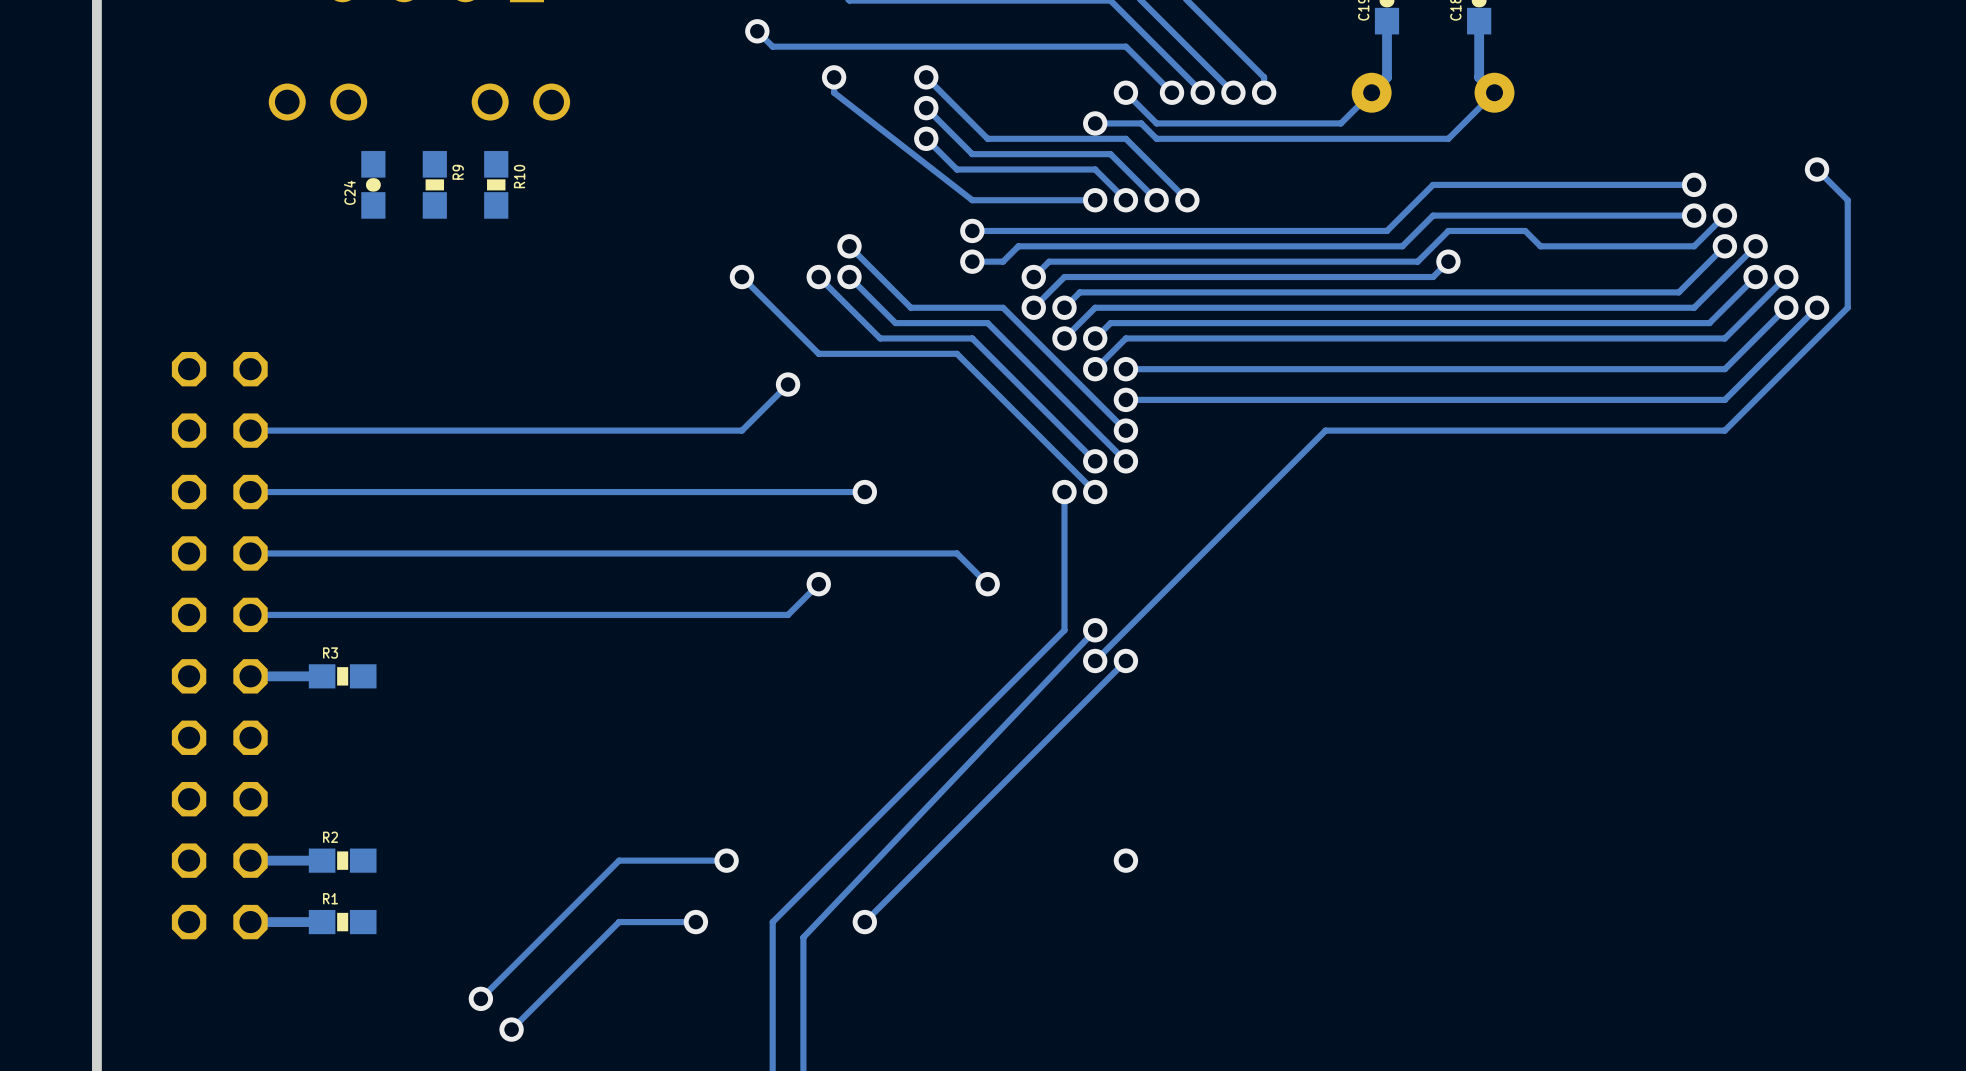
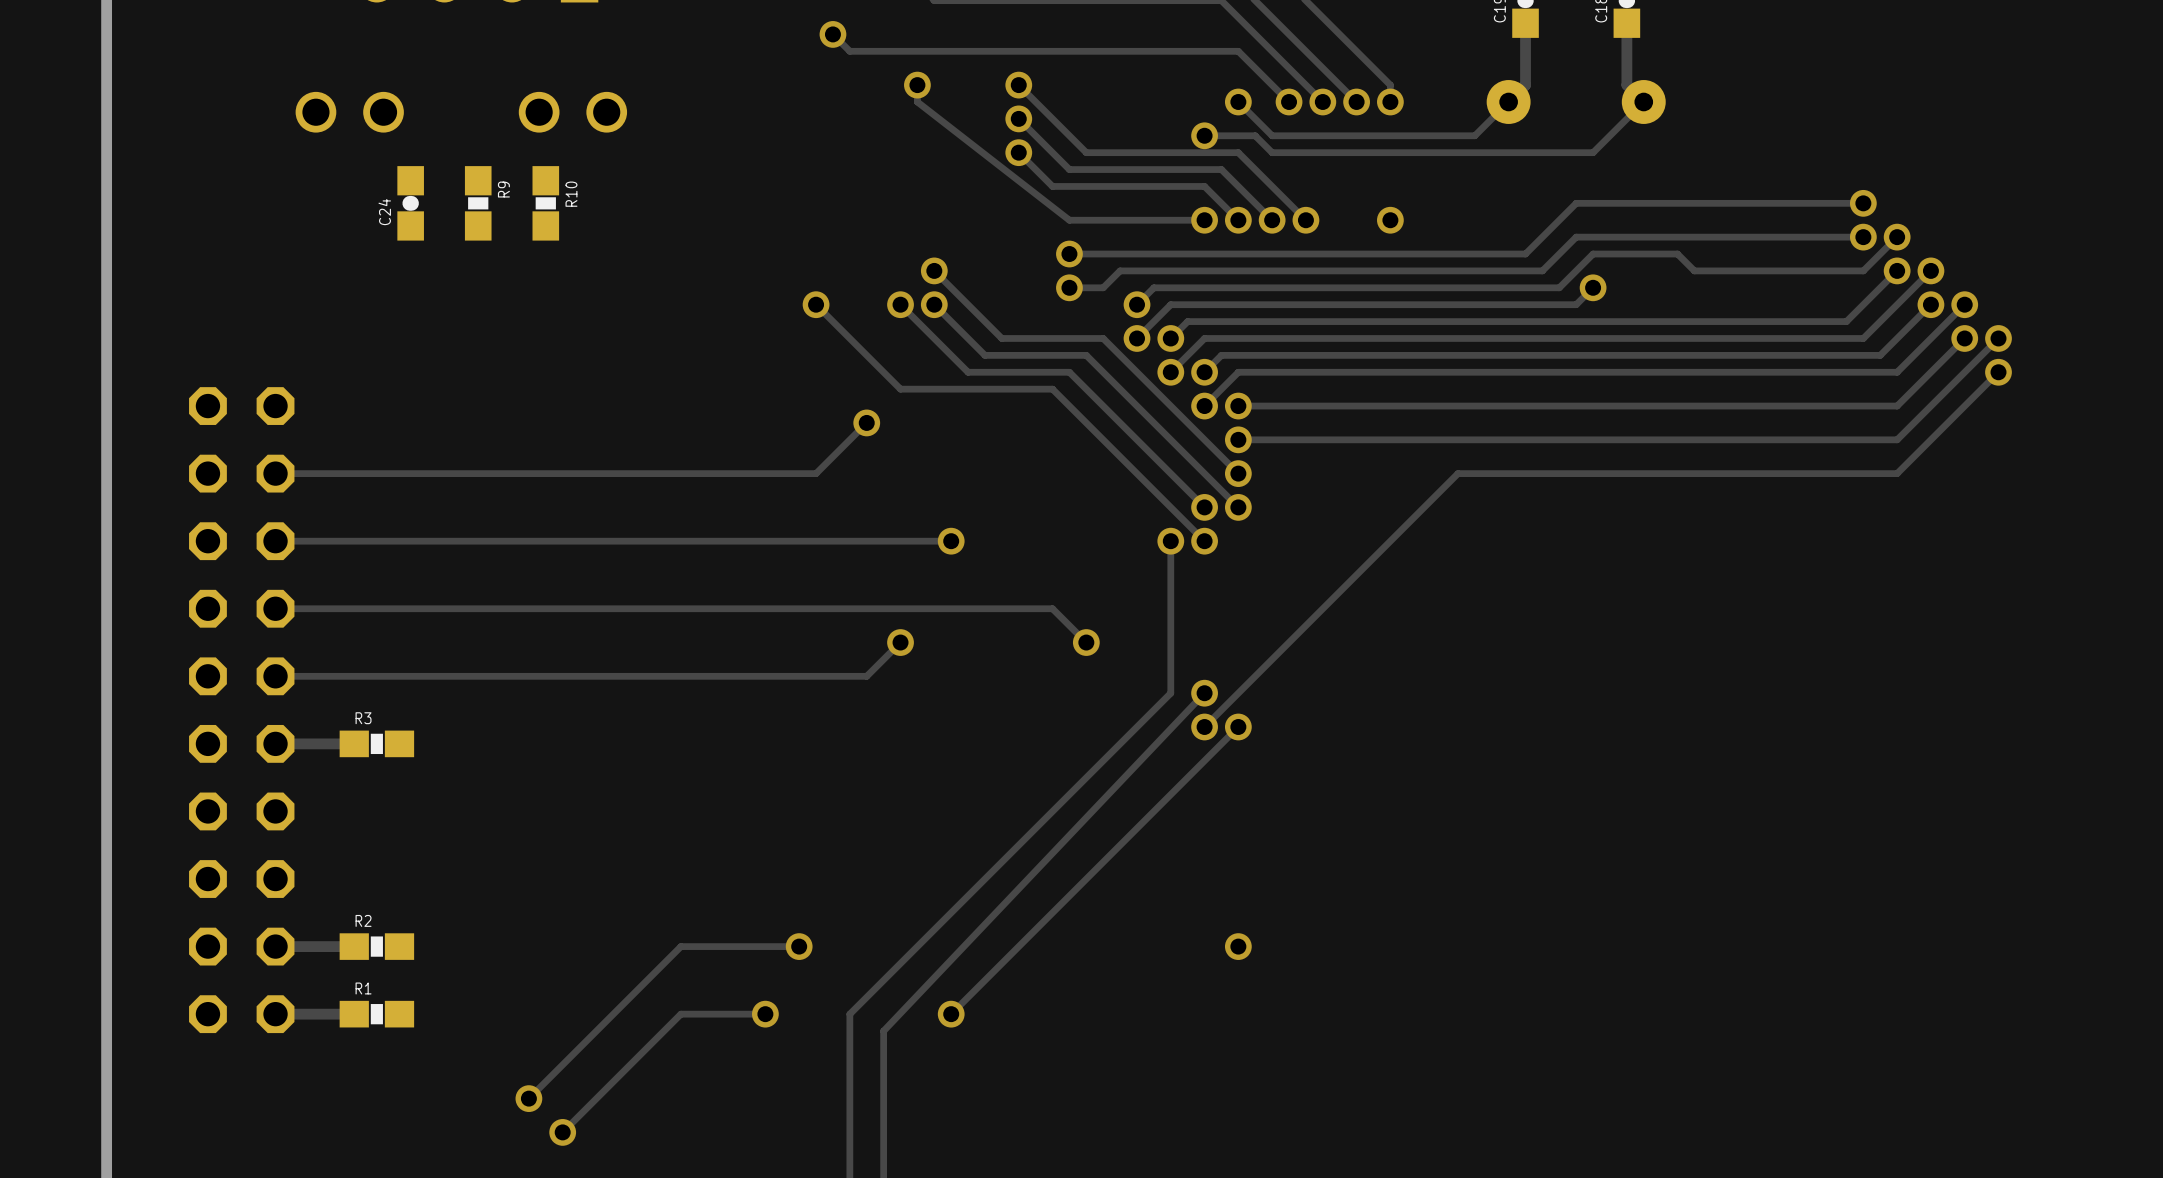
track: (1817, 169) (1847, 200) (1847, 307) (1817, 338) -> none
via: (1817, 169) -> none
via: none -> (1390, 220)
via: none -> (1998, 372)

